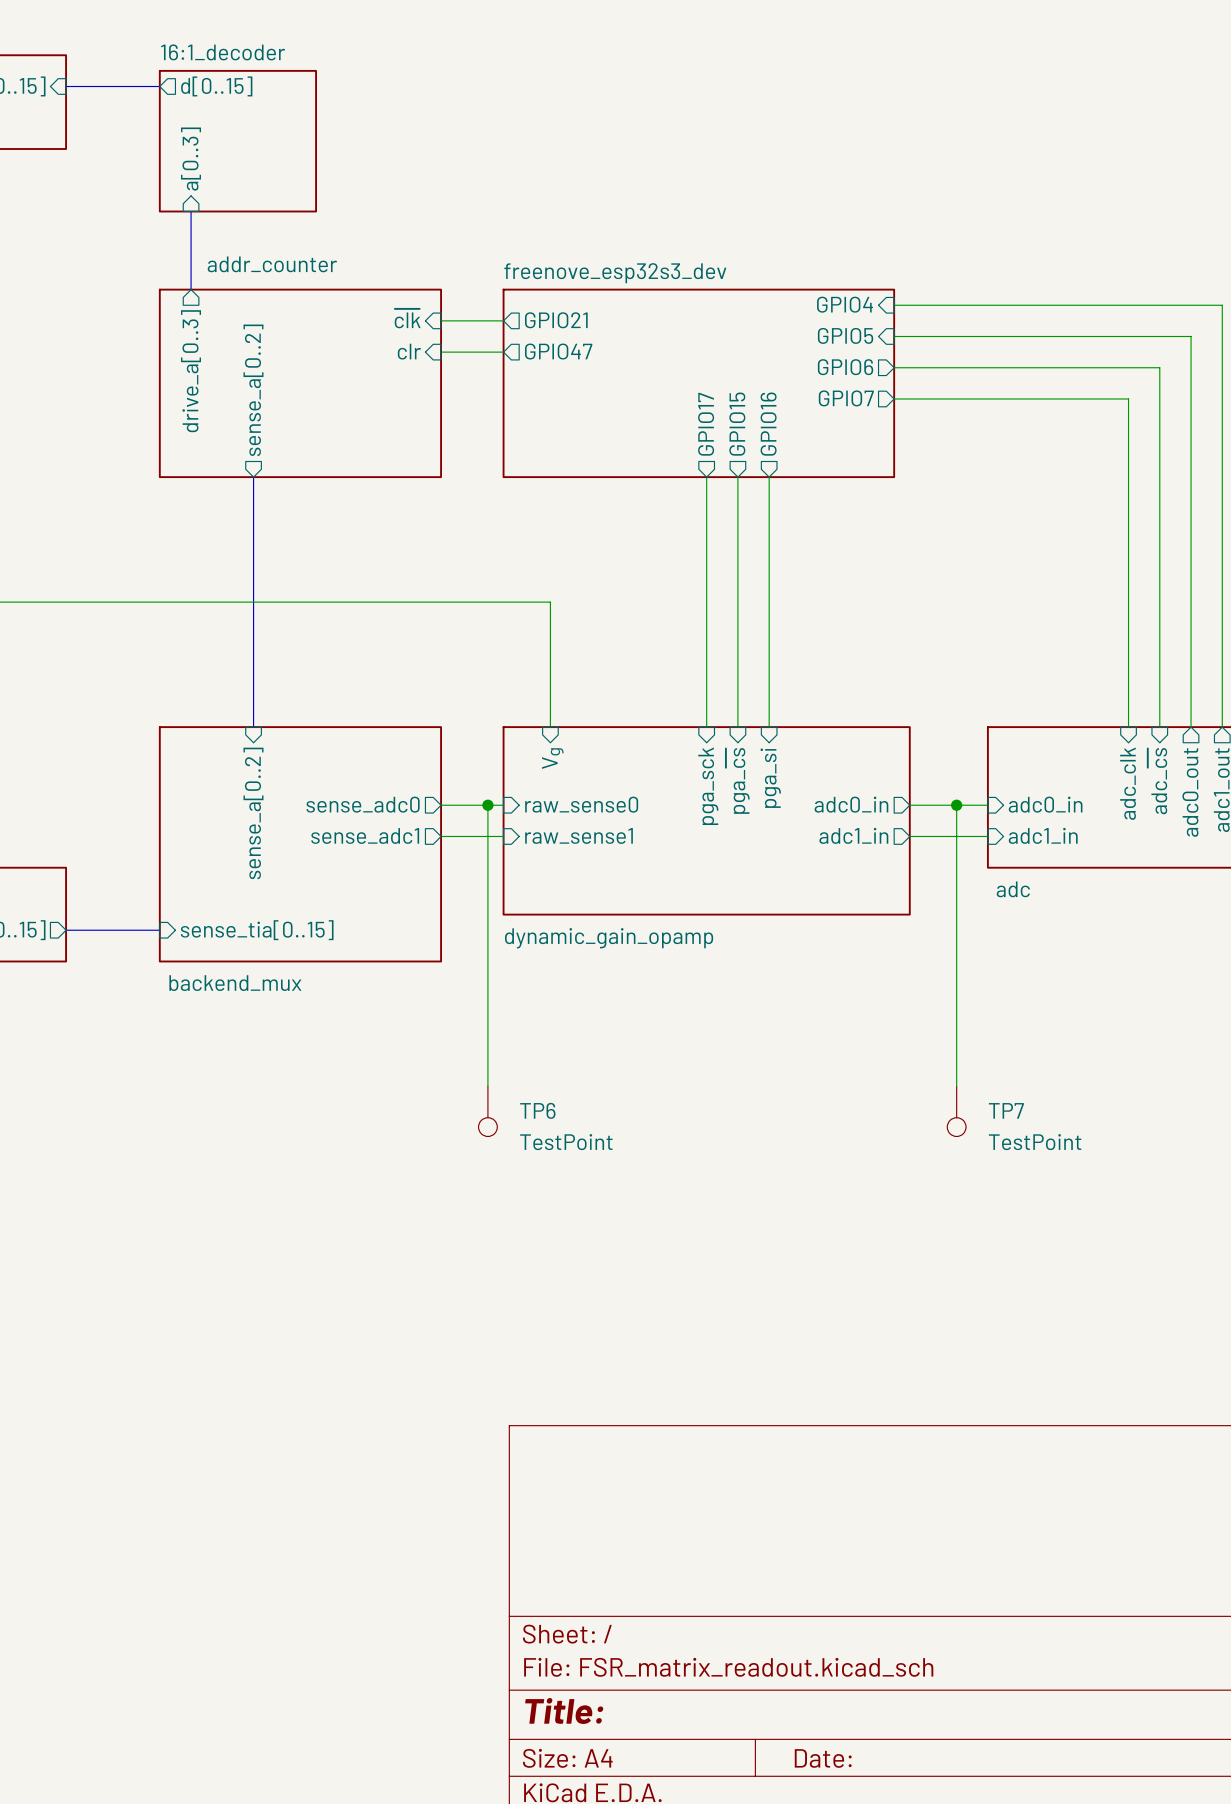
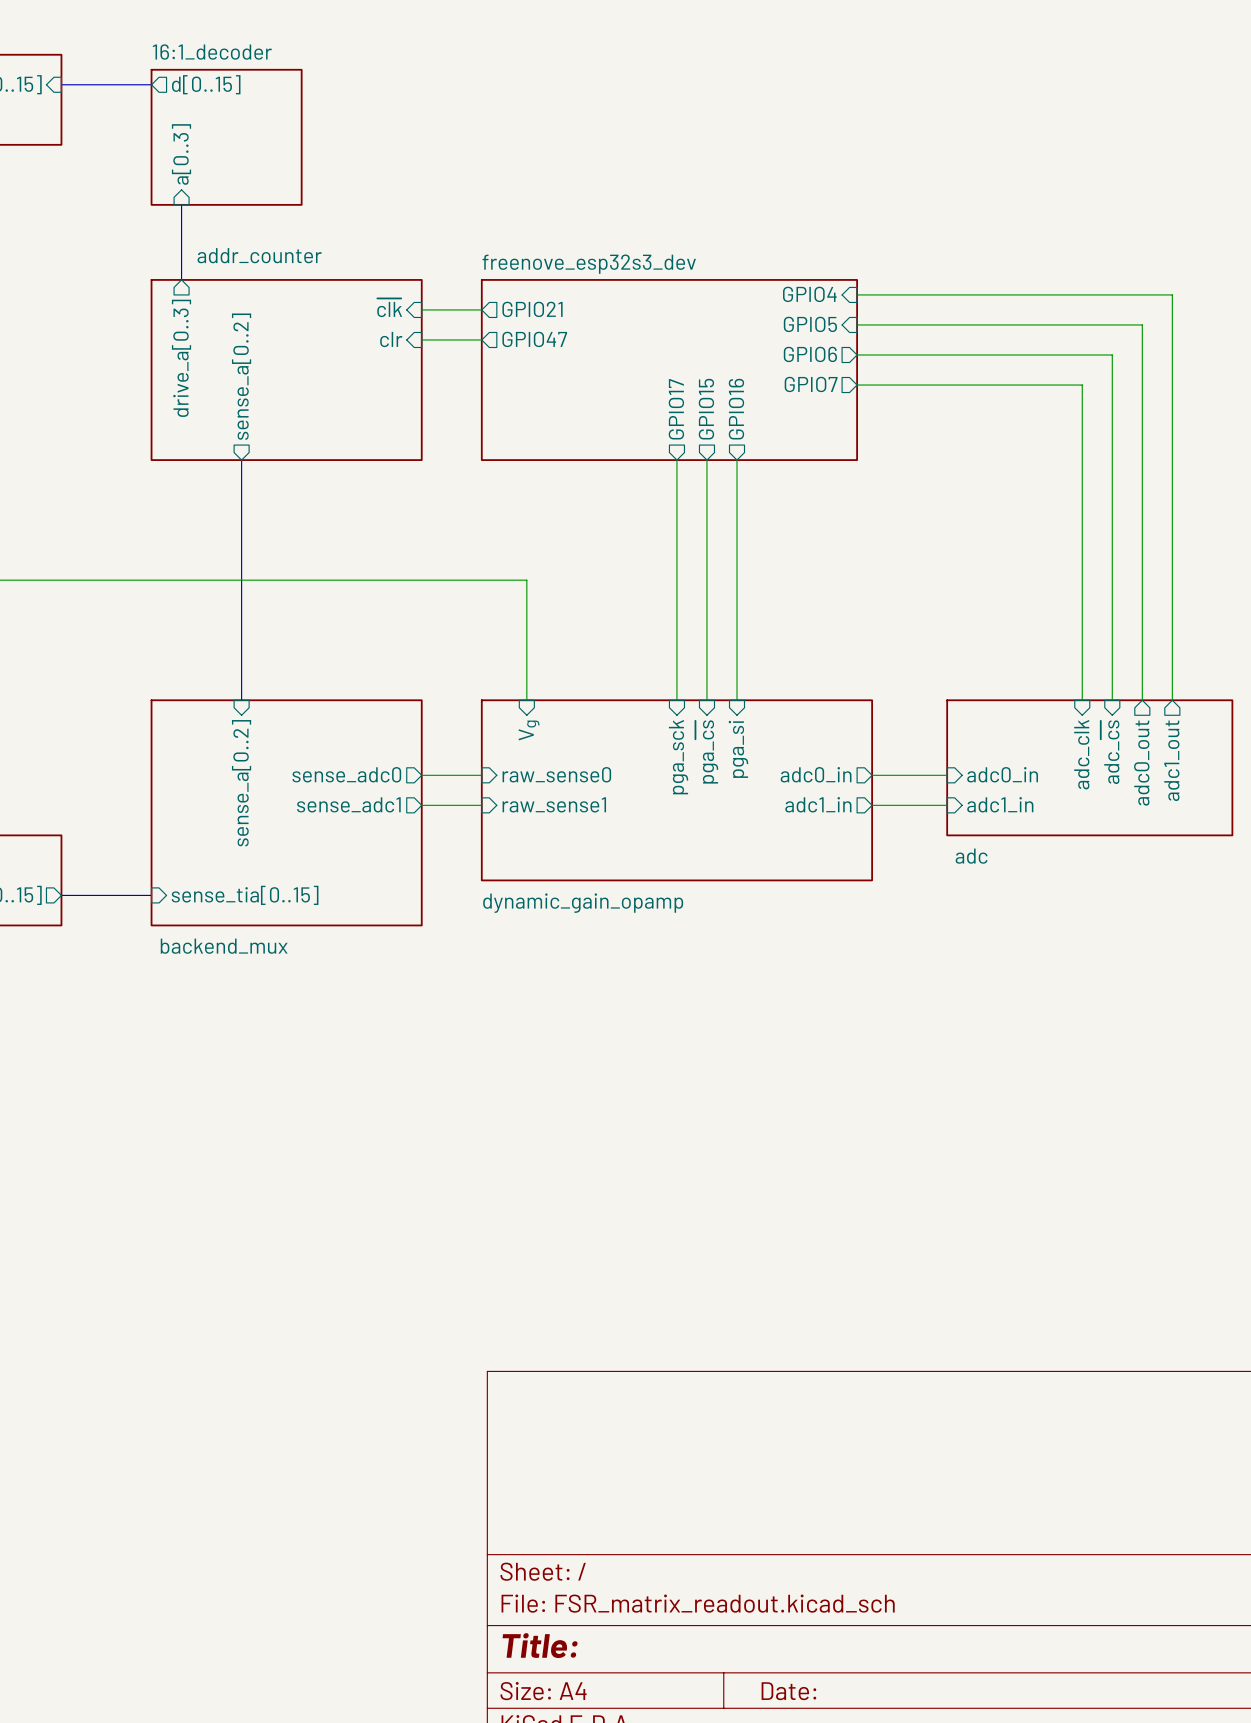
wire: (487, 805) (487, 1086) -> none
junction: (487, 805) -> none
wire: (956, 805) (956, 1086) -> none
junction: (956, 805) -> none
TP6: TestPoint (487, 1111) -> none
TP7: TestPoint (956, 1111) -> none

